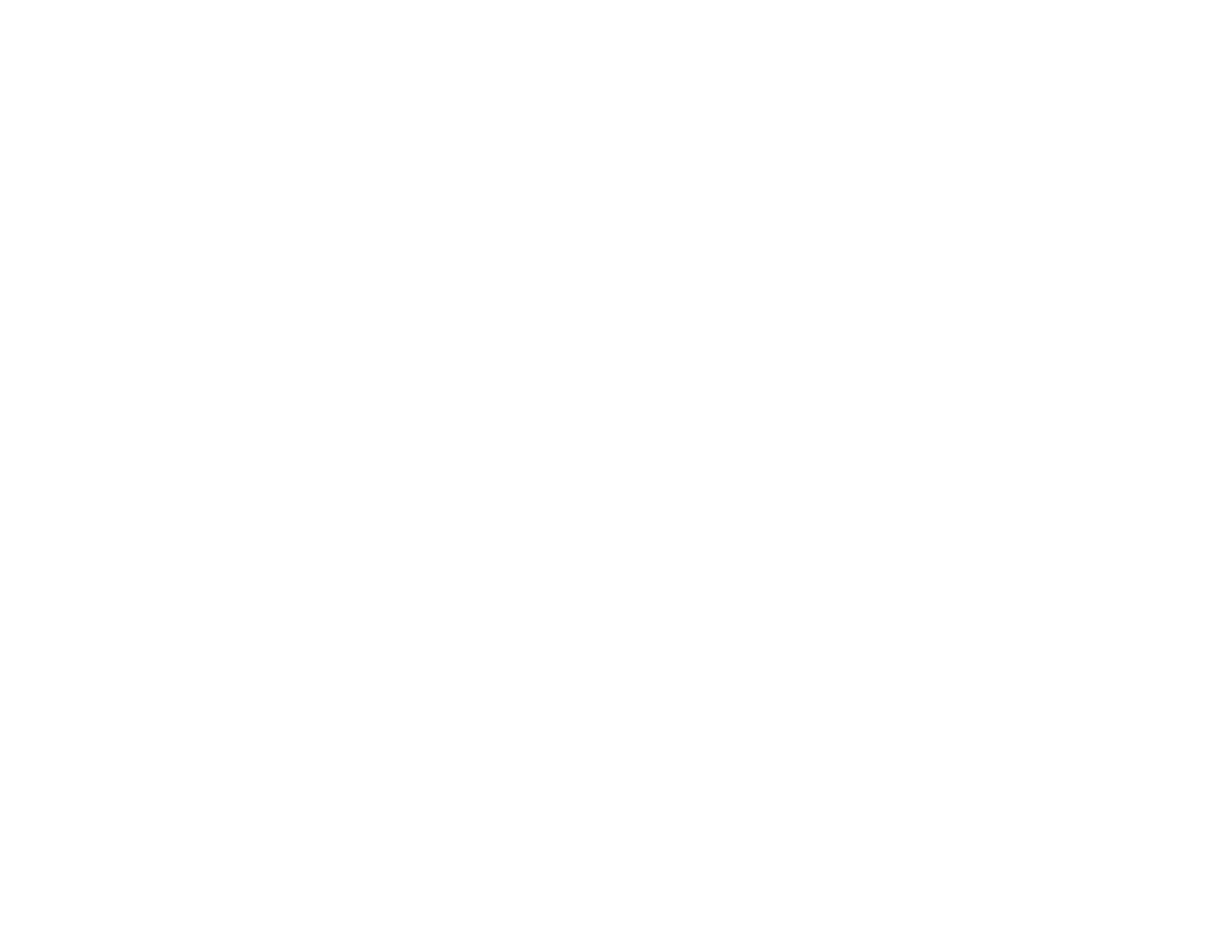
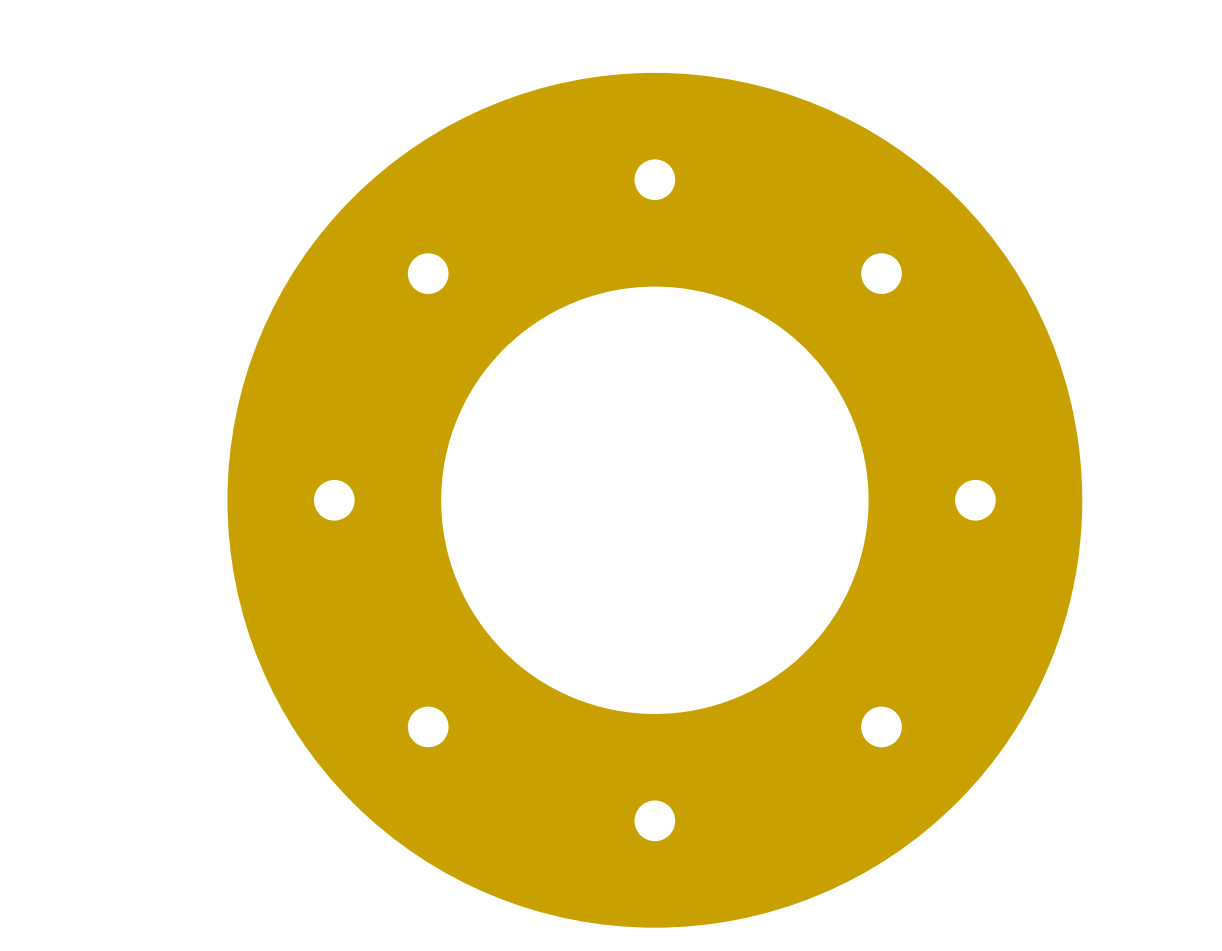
part: none -> (654, 500)

